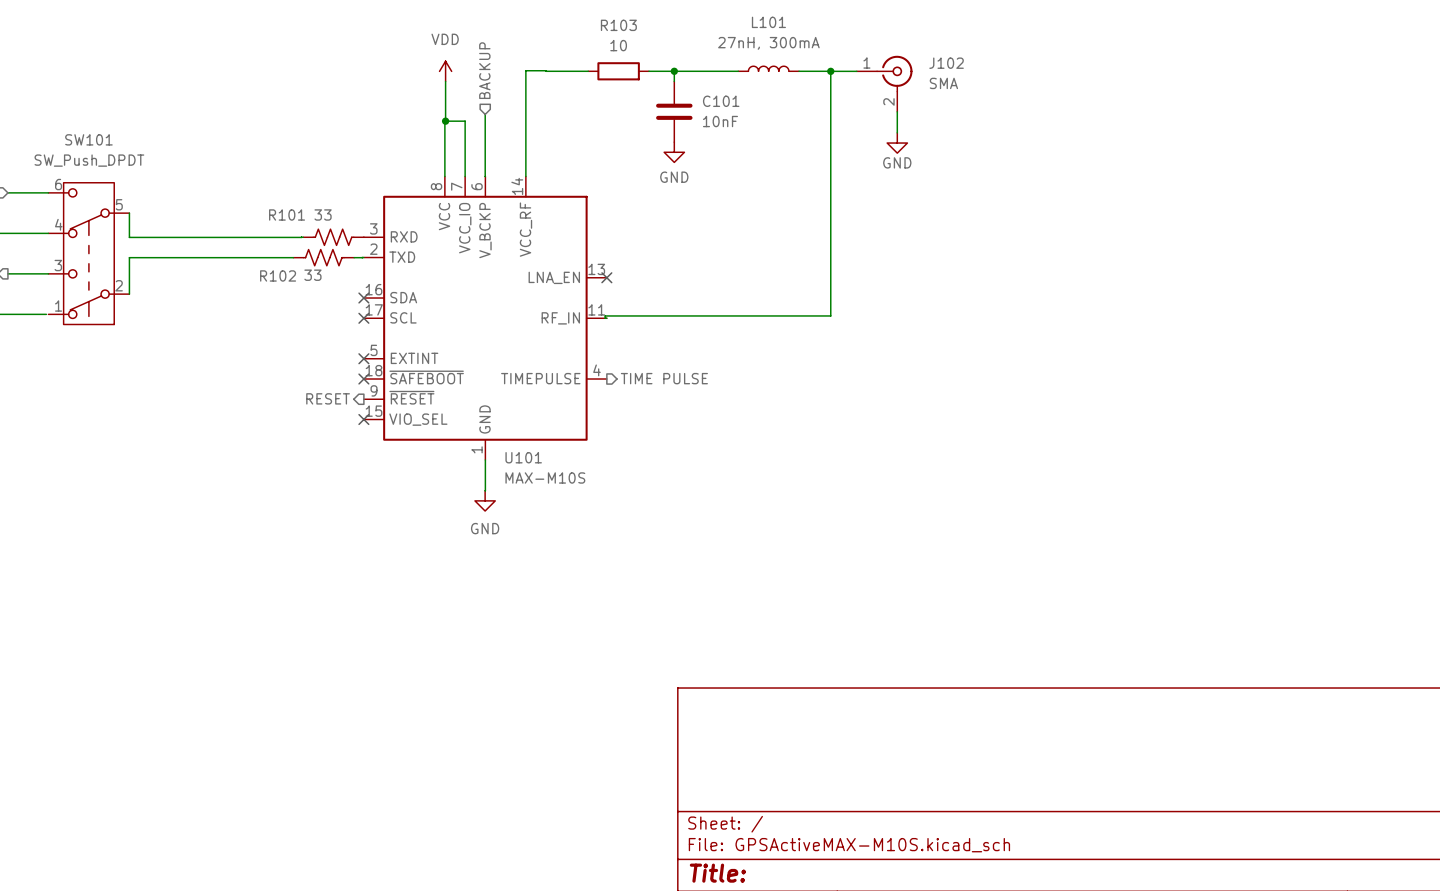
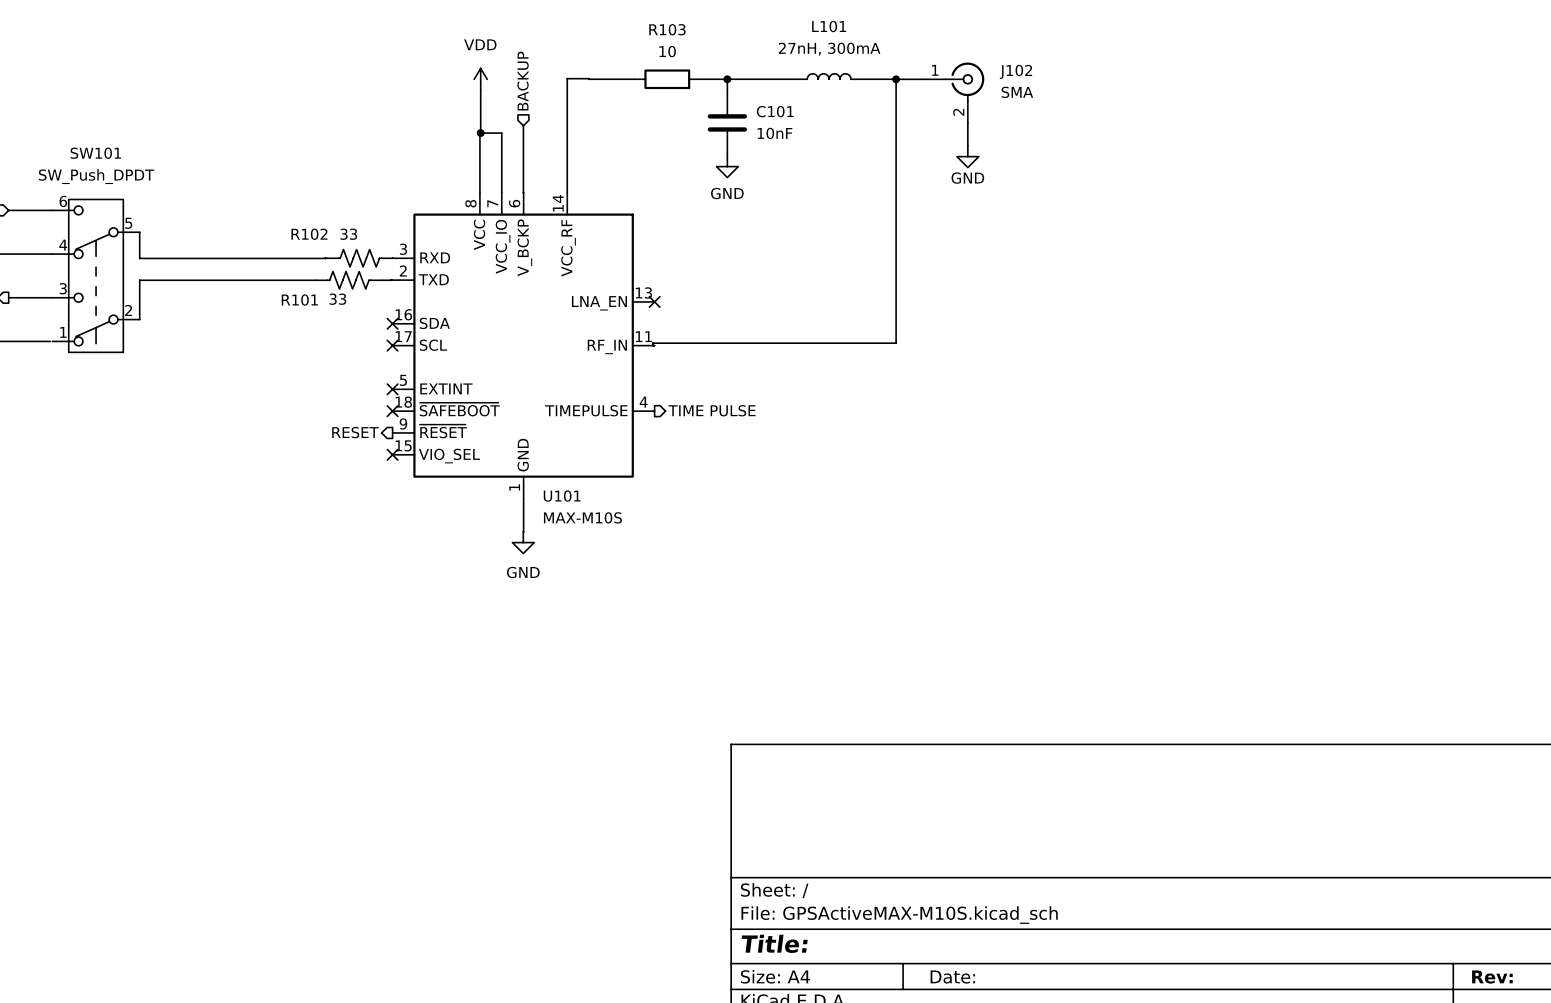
R101 name: R101 (287, 214) -> R102 (309, 234)
R102 name: R102 (278, 275) -> R101 (299, 300)

